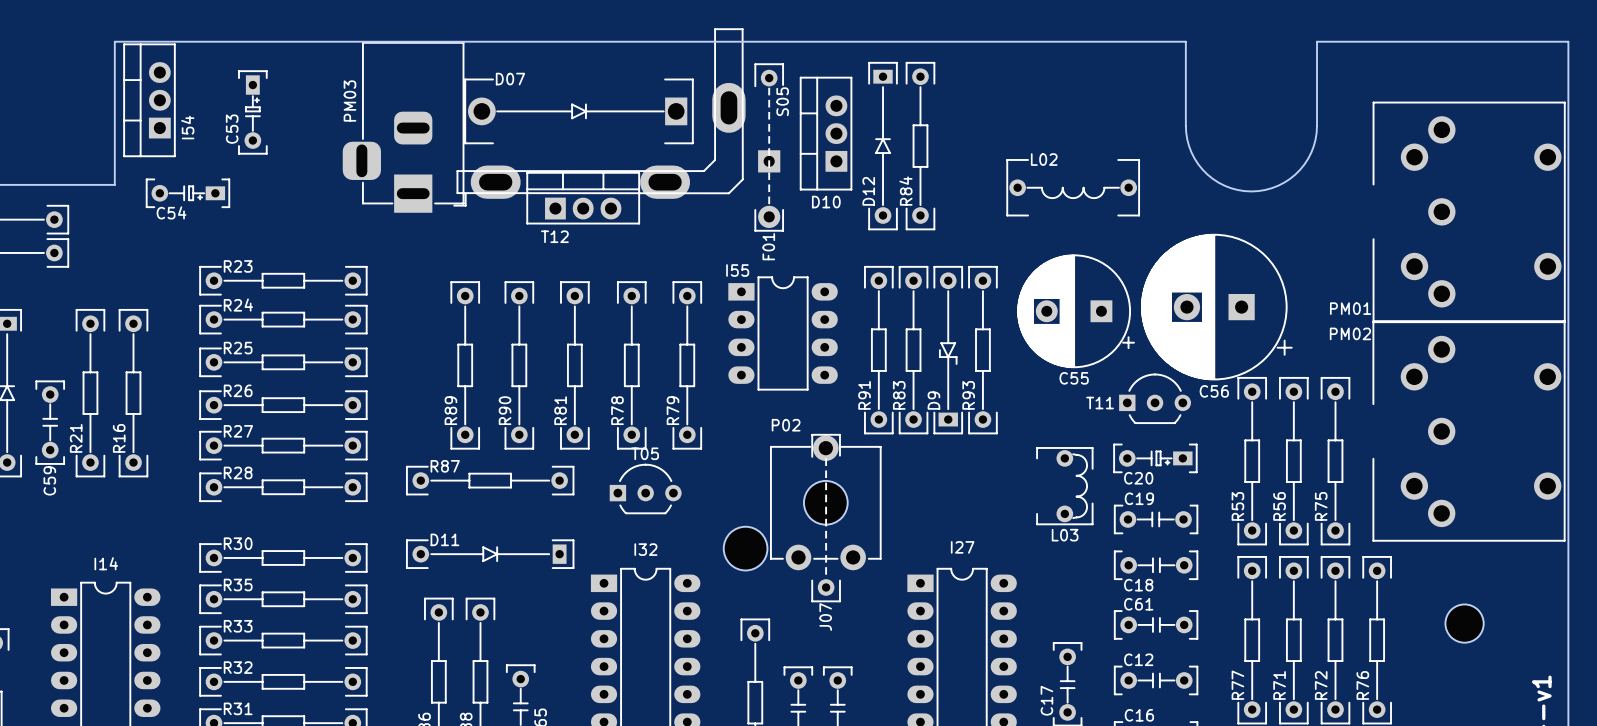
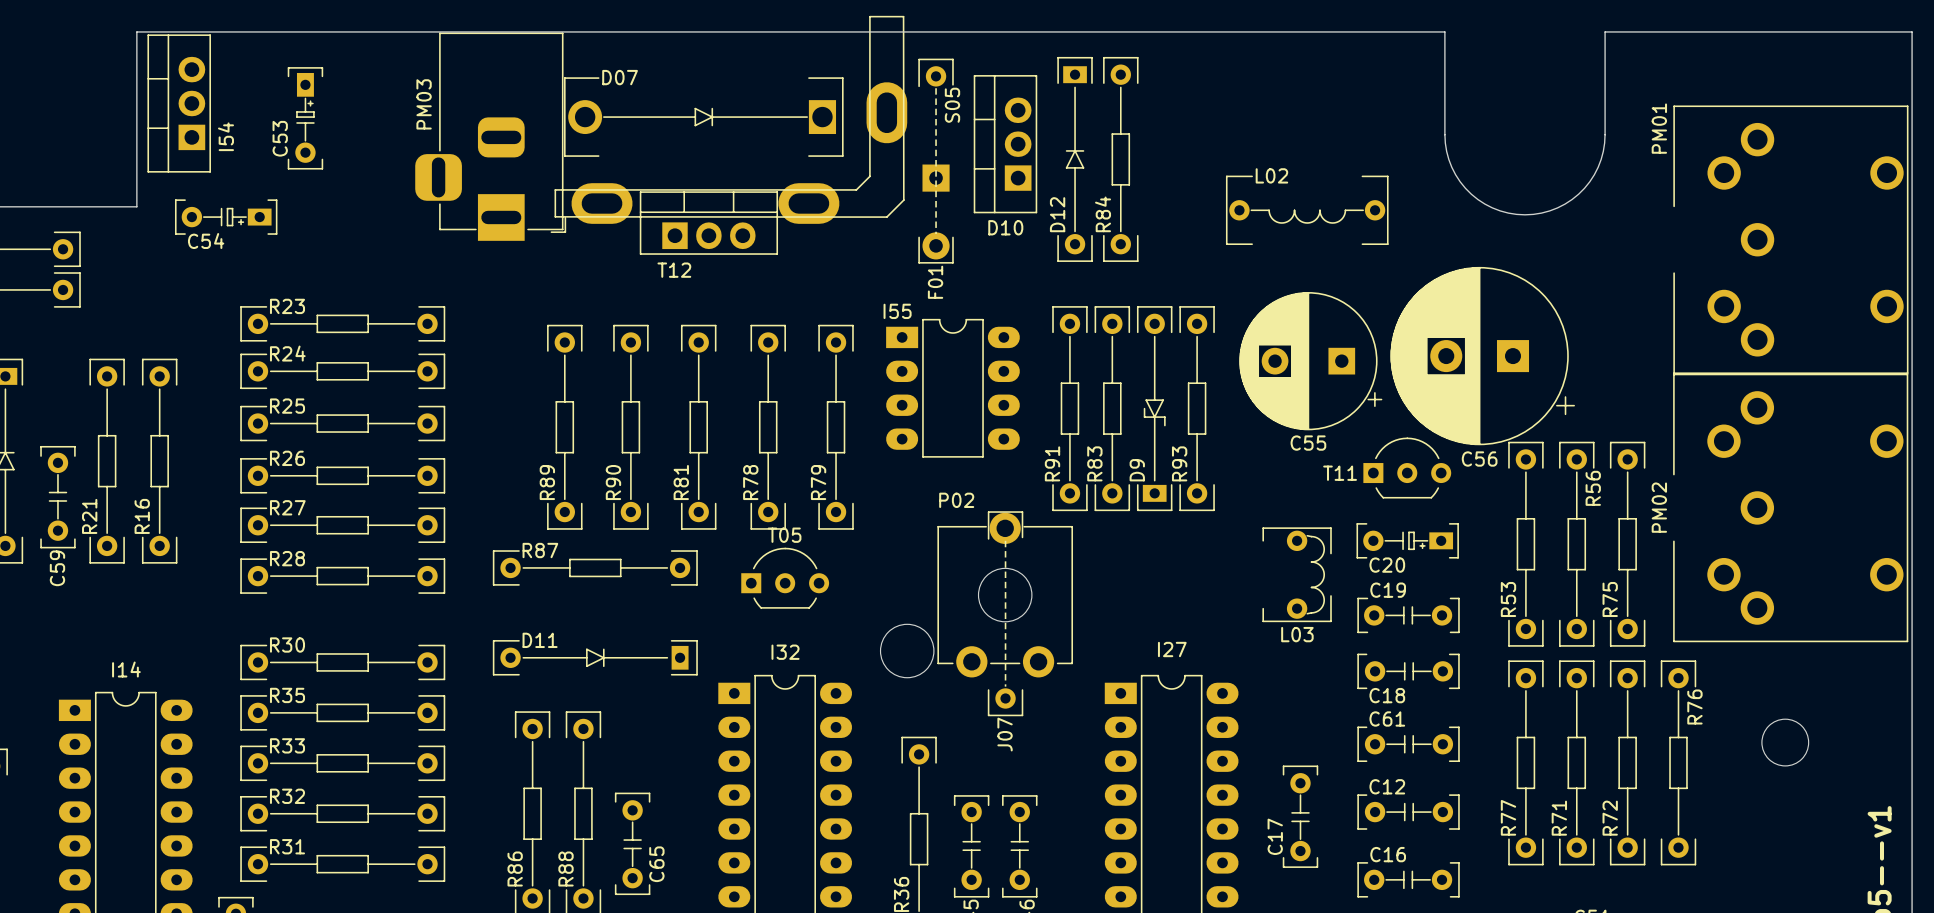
PM01 name rotation: 0° (1350, 308) -> 90° counterclockwise (1659, 128)
PM01 name position: PM01 (1350, 308) -> PM01 (1659, 128)
PM02 name rotation: 0° (1350, 333) -> 90° counterclockwise (1659, 507)
PM02 name position: PM02 (1350, 333) -> PM02 (1659, 507)
R56 name position: R56 (1279, 506) -> R56 (1593, 488)
R76 name position: R76 (1362, 685) -> R76 (1694, 707)

